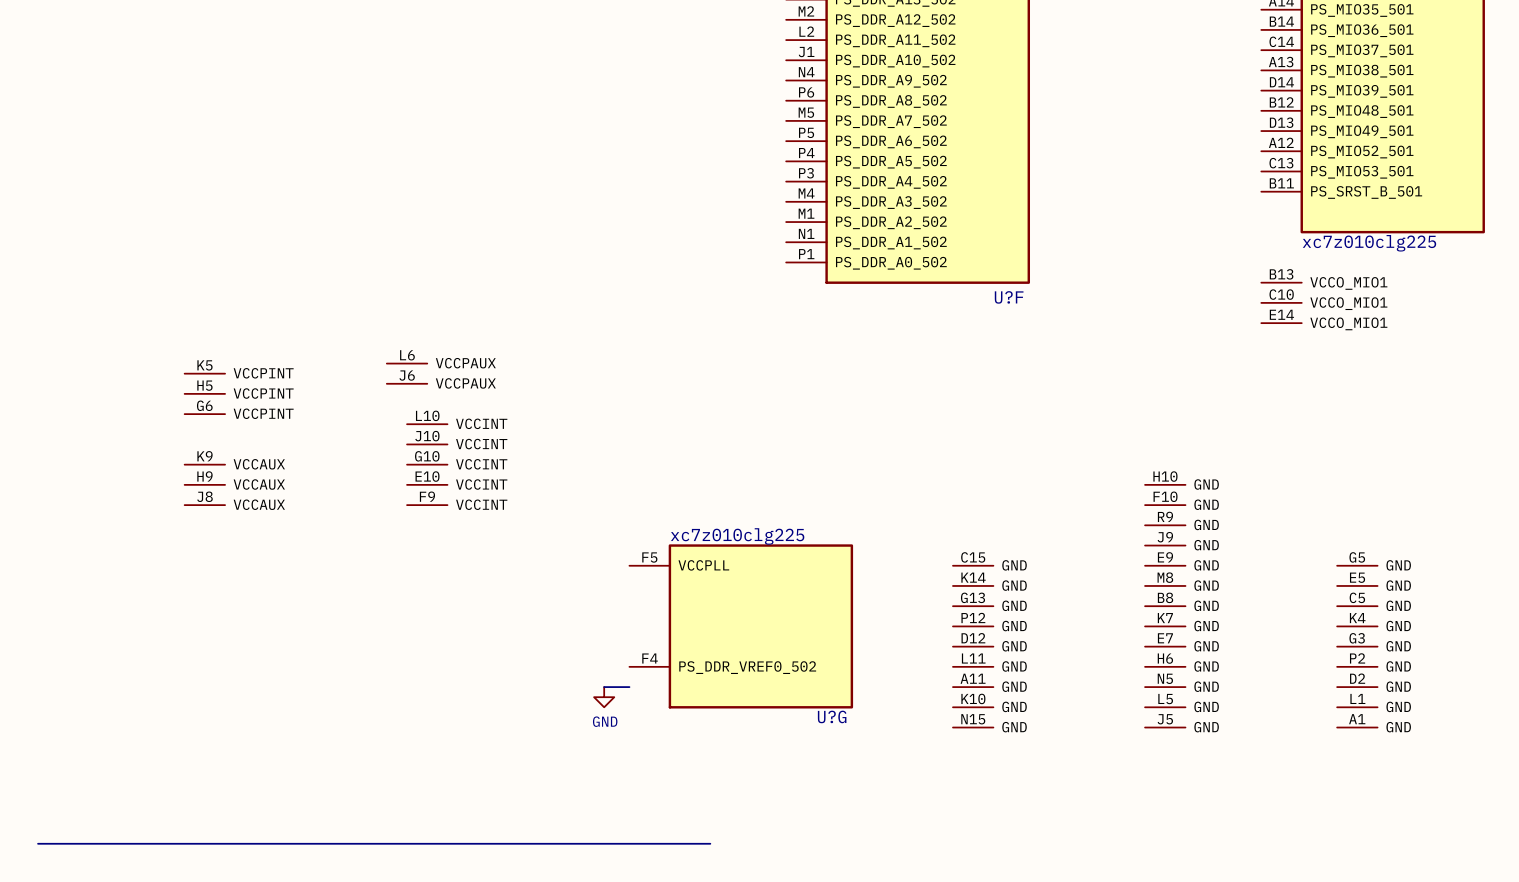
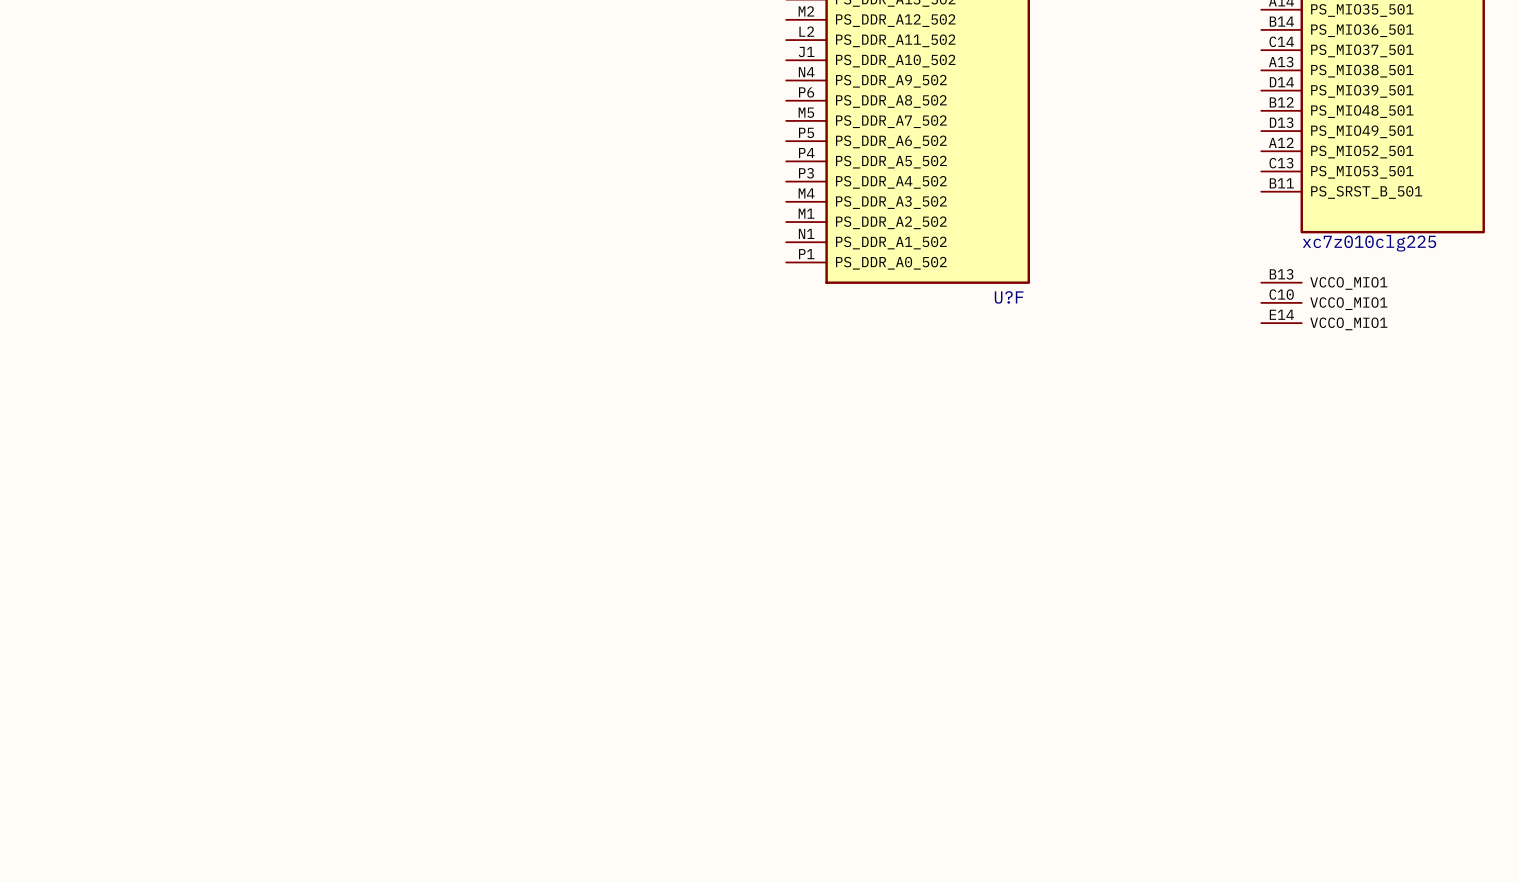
U?G: xc7z010clg225 (781, 545) -> none
wire: (604, 687) (629, 687) -> none
power symbol: GND (604, 697) -> none
wire: (38, 843) (710, 843) -> none

